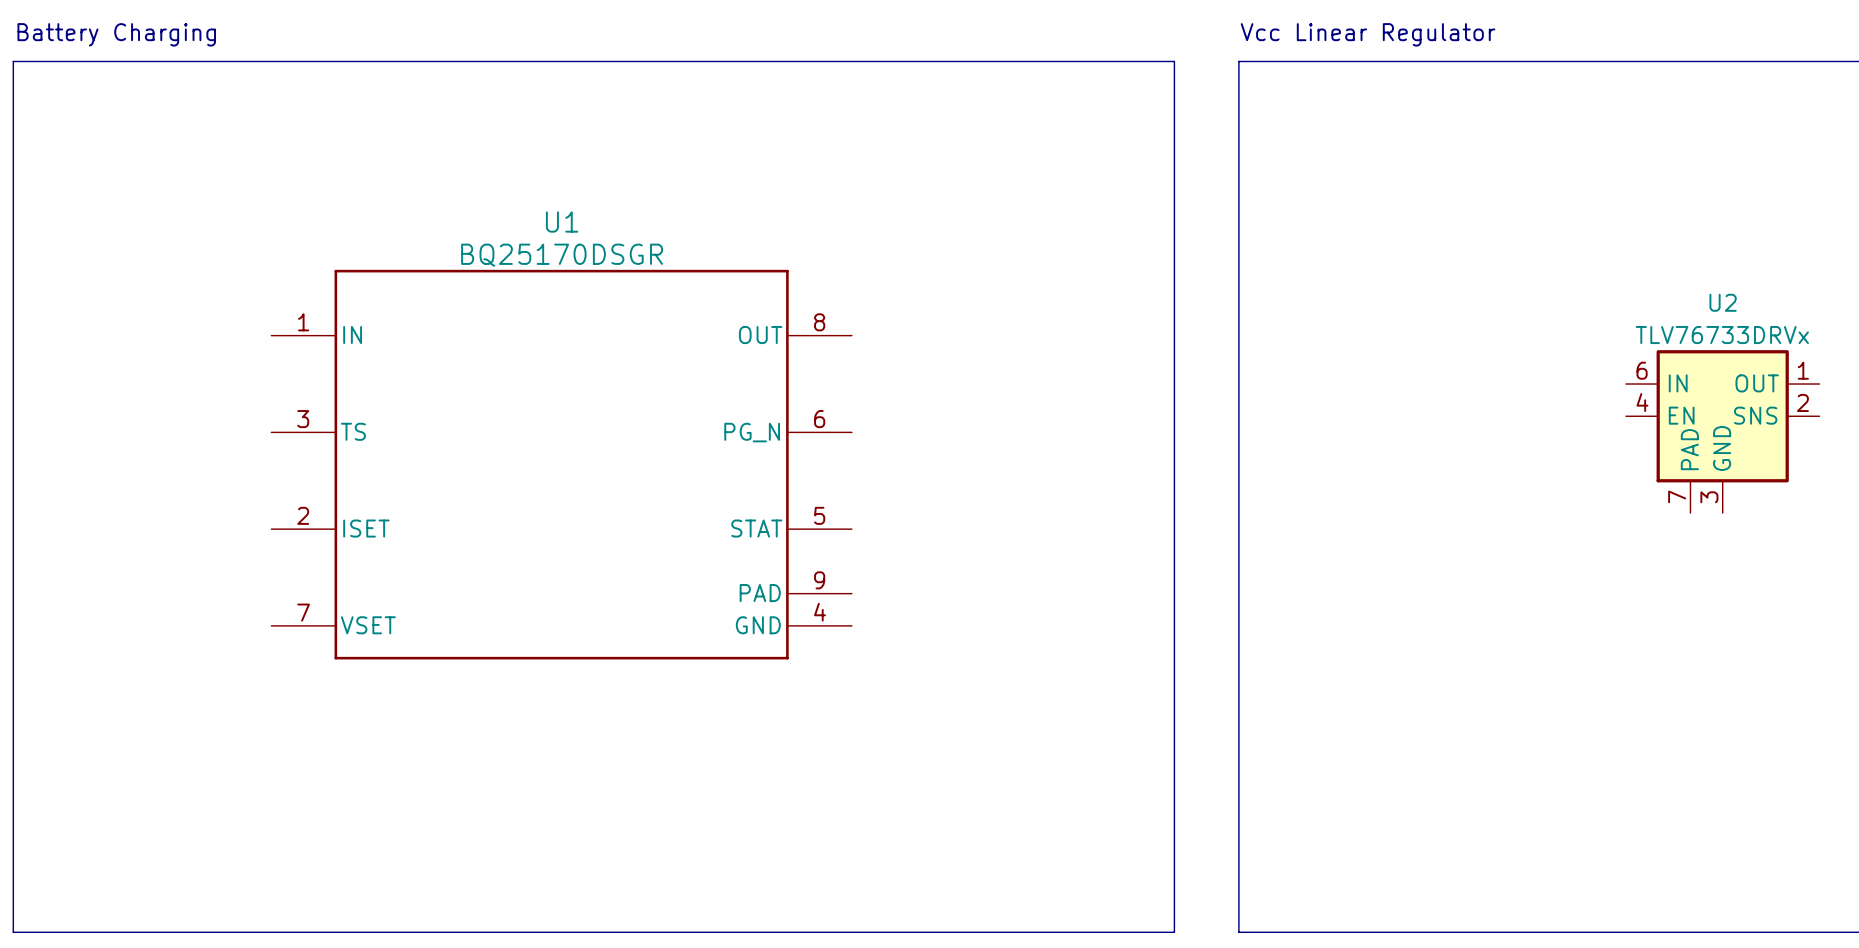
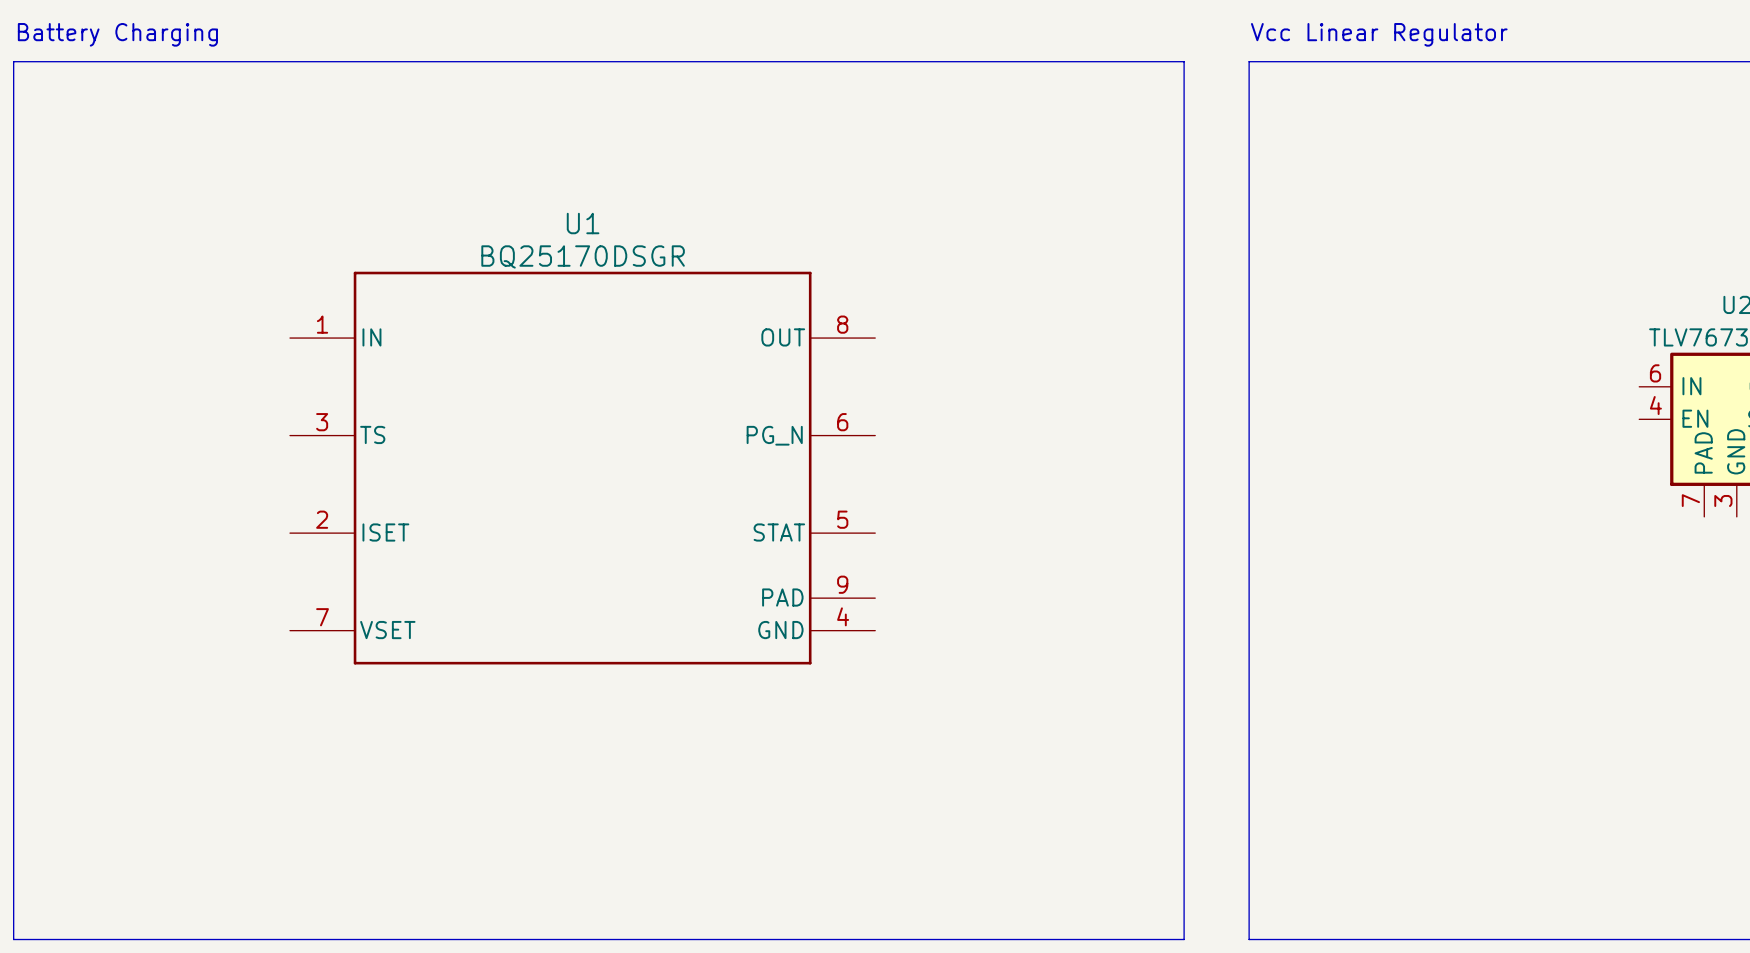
U1 position: (561, 464) -> (582, 468)

